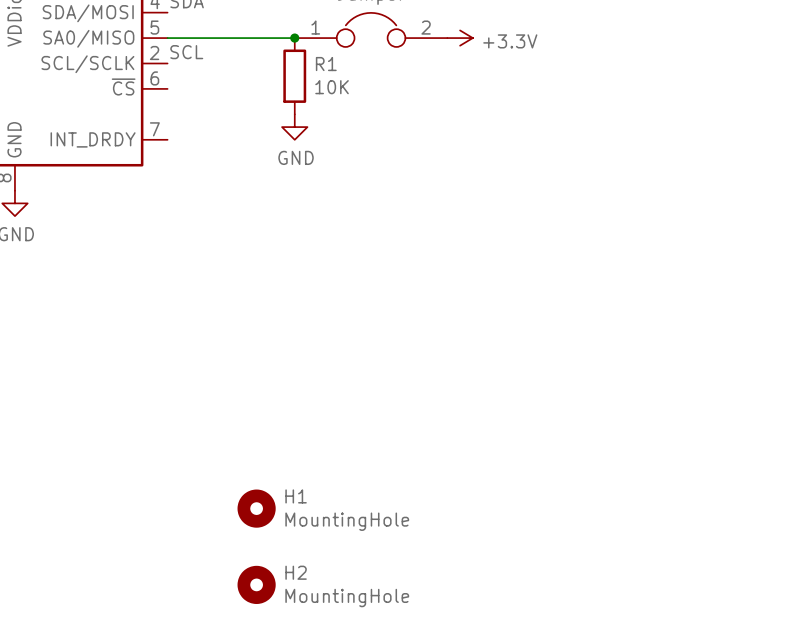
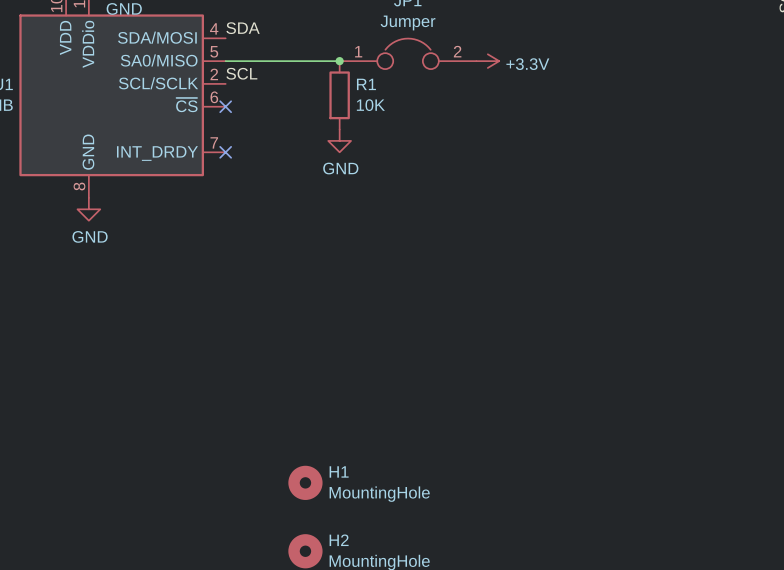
no-connect mark: none -> (225, 106)
no-connect mark: none -> (225, 152)

